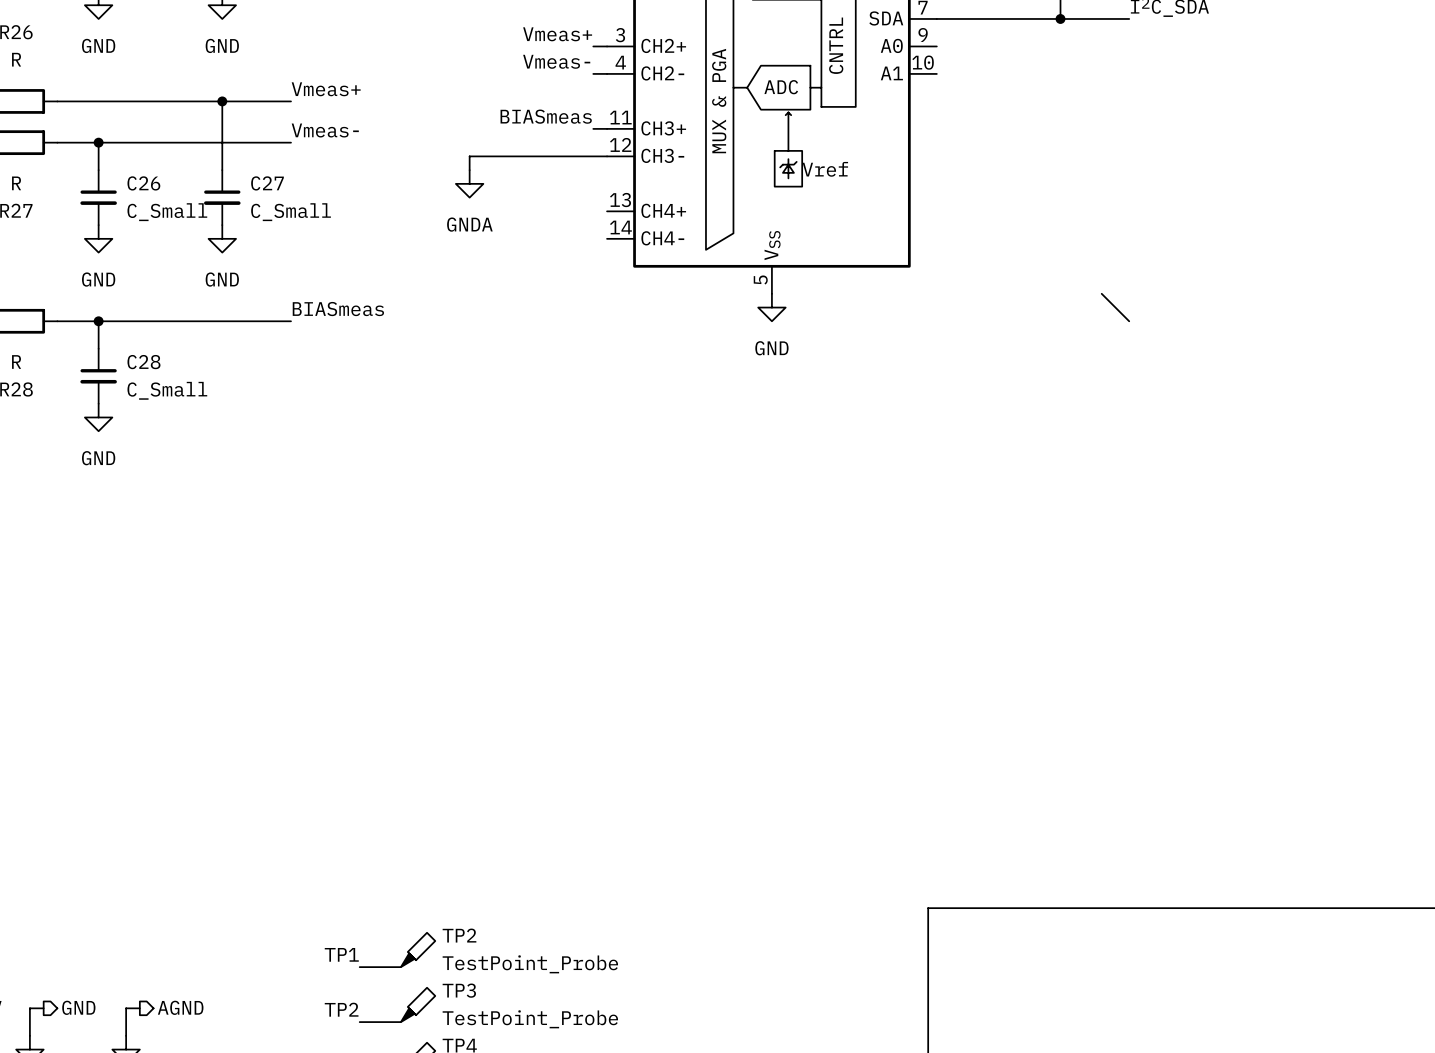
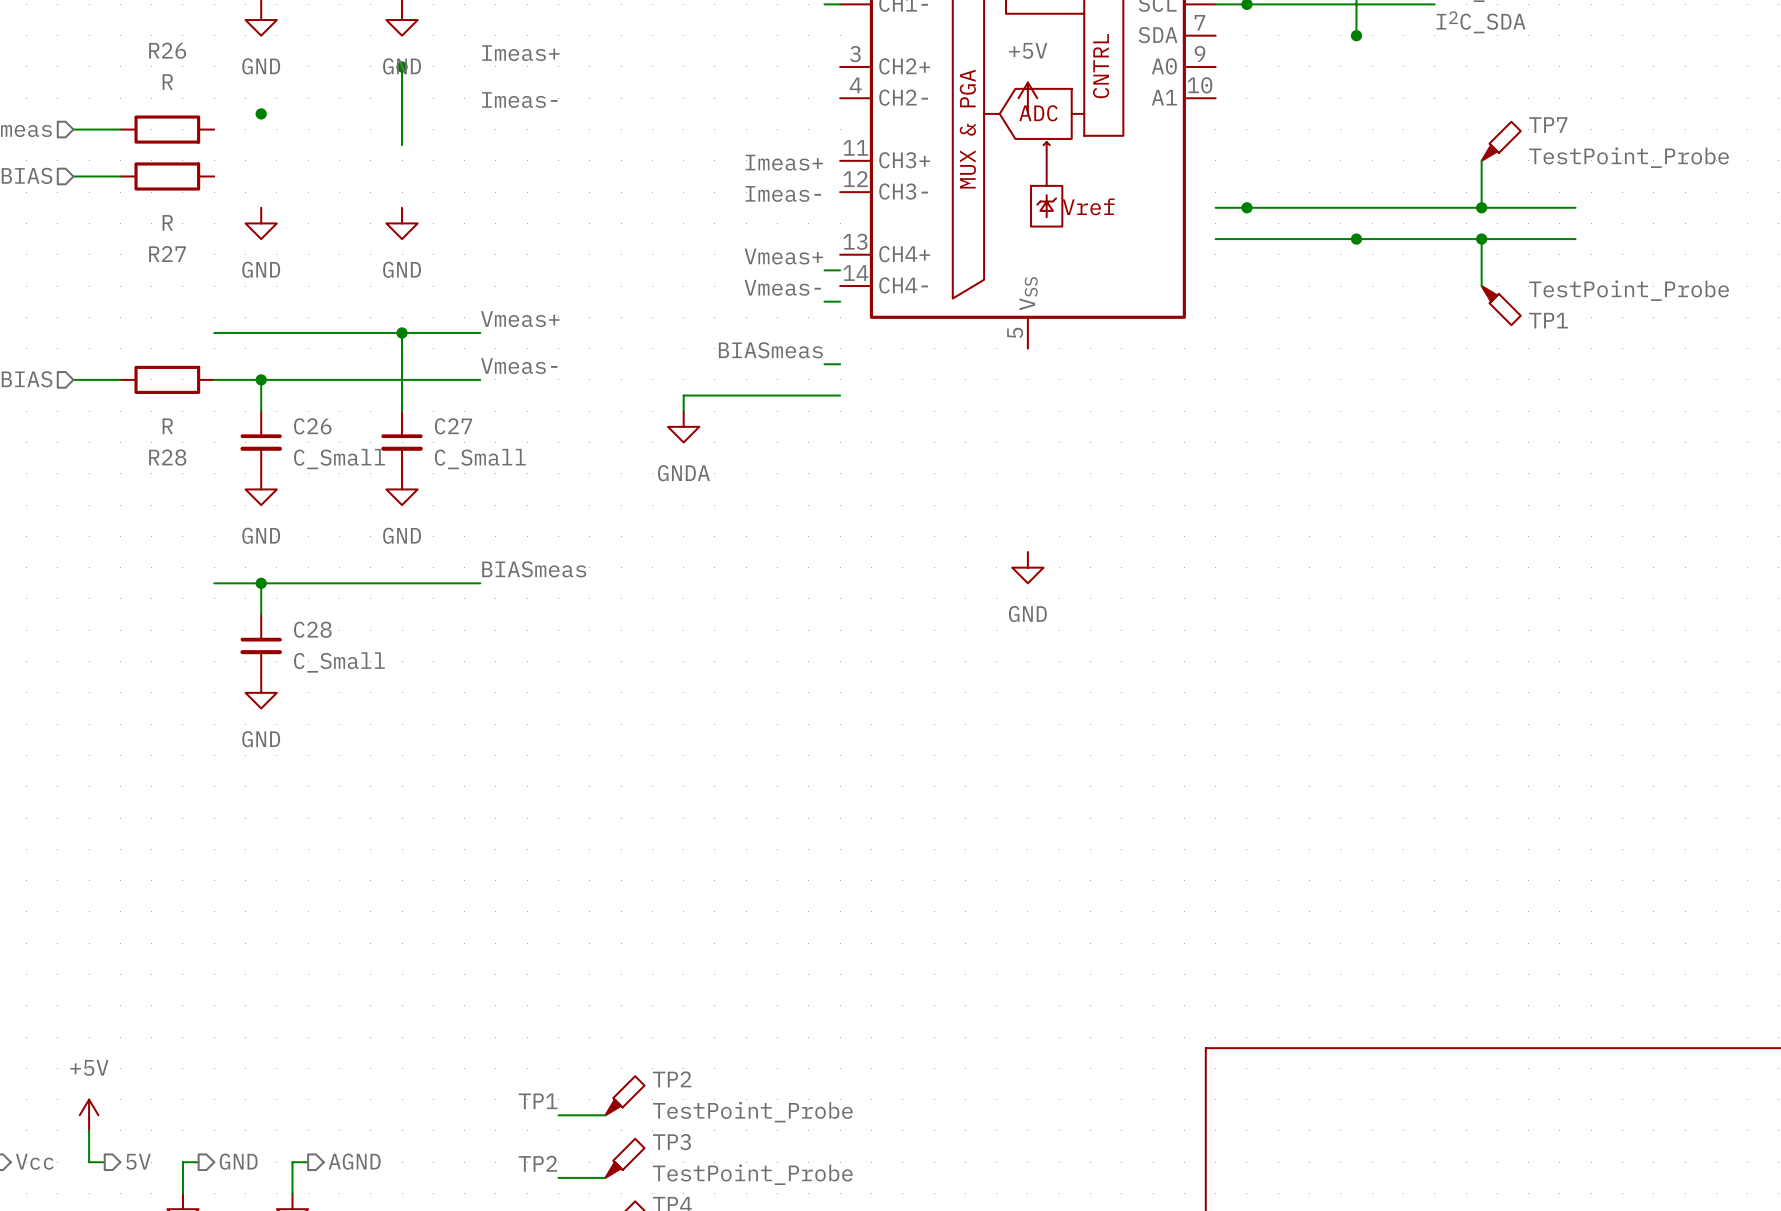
wire: (936, 18) (1129, 18) -> none
label: none -> Imeas+ (520, 53)
label: Vmeas+ (557, 34) -> none
wire: (593, 46) (607, 46) -> (824, 270) (840, 270)
label: Vmeas- (556, 61) -> none
wire: (593, 73) (607, 73) -> (824, 301) (840, 301)
power symbol: none -> +5V (1027, 98)
label: Vmeas+ (326, 89) -> Imeas- (519, 100)
wire: (57, 101) (291, 101) -> (214, 332) (480, 332)
junction position: (222, 101) -> (402, 66)
TP7: none -> TestPoint_Probe (1501, 141)
wire: (222, 115) (222, 170) -> (402, 66) (402, 129)
label position: BIASmeas (546, 116) -> BIASmeas (770, 350)
wire: (593, 128) (607, 128) -> (824, 364) (840, 364)
wire: none -> (1481, 160) (1481, 207)
label: Vmeas- (325, 130) -> none
label: none -> Imeas+ (784, 162)
wire: (57, 142) (291, 142) -> none
wire: (98, 142) (98, 170) -> none
junction position: (98, 142) -> (261, 113)
wire: (607, 156) (469, 156) (469, 170) -> (840, 395) (683, 395) (683, 411)
label: none -> Imeas- (783, 193)
wire: none -> (1215, 207) (1575, 207)
junction: none -> (1246, 207)
junction: none -> (1481, 207)
power symbol position: GNDA (469, 183) -> GNDA (683, 426)
C26: C_Small (98, 197) -> none
C27 position: (222, 197) -> (402, 442)
wire: none -> (1215, 239) (1575, 239)
junction: none -> (1356, 239)
wire: none -> (1481, 239) (1481, 286)
junction: none -> (1481, 239)
label: none -> Vmeas+ (783, 256)
power symbol position: GND (98, 238) -> GND (261, 223)
power symbol position: GND (222, 238) -> GND (402, 223)
label: none -> Vmeas- (782, 287)
TP1: none -> TestPoint_Probe (1501, 305)
label: none -> Vmeas+ (520, 319)
wire: none -> (402, 332) (402, 411)
junction: none -> (402, 332)
wire: (1101, 293) (1129, 321) -> none
power symbol position: GND (771, 307) -> GND (1027, 567)
label: BIASmeas (338, 309) -> Vmeas- (519, 366)
C28 name: C28 (143, 362) -> C26 (312, 426)
power symbol: none -> GND (402, 489)
label: none -> BIASmeas (534, 569)
wire: none -> (214, 583) (480, 583)
wire: none -> (261, 583) (261, 614)
junction: none -> (261, 583)
C28: none -> C_Small (261, 645)
power symbol: none -> GND (261, 692)

